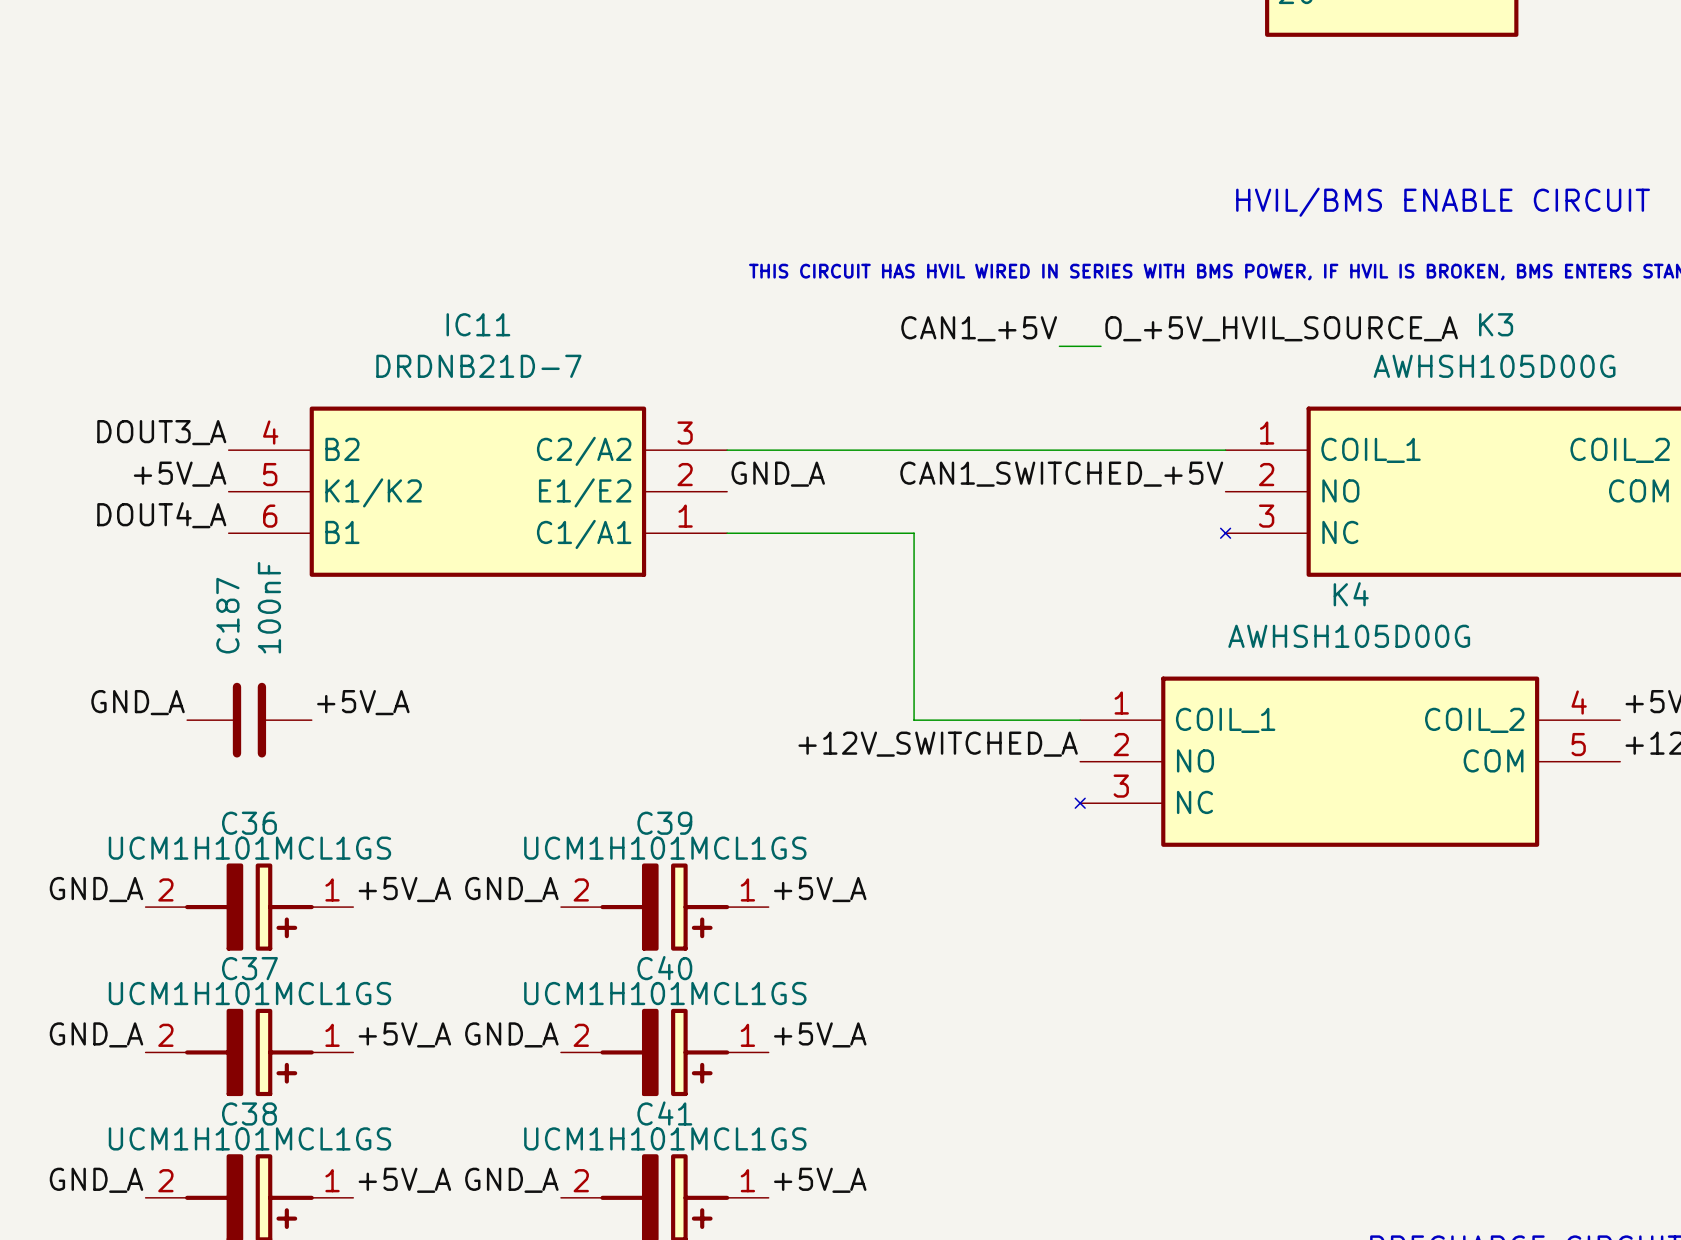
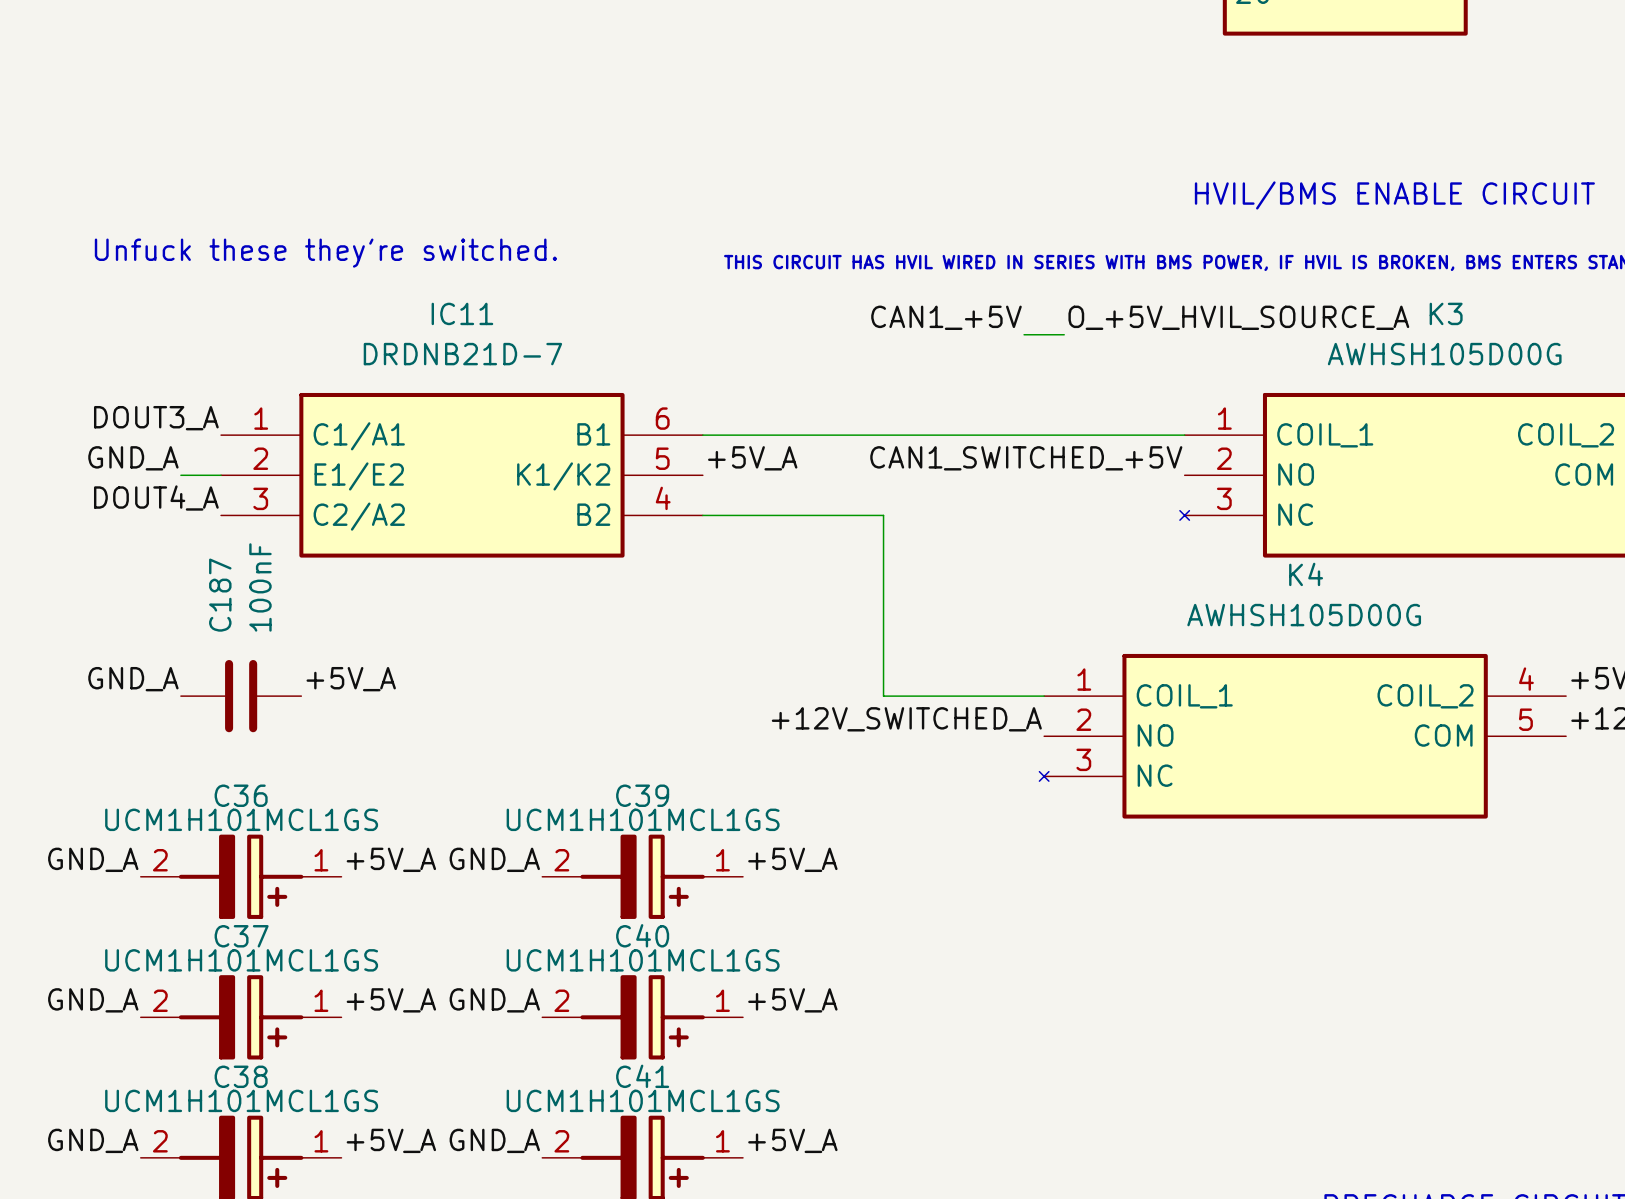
text: none -> Unfuck these they're switched. (325, 253)
label: none -> GND_A (133, 458)
label: +5V_A (180, 474) -> none
label: GND_A (778, 474) -> +5V_A (752, 458)
wire: none -> (180, 475) (221, 475)
IC11 rotation: 0° (477, 491) -> 180° (461, 475)

